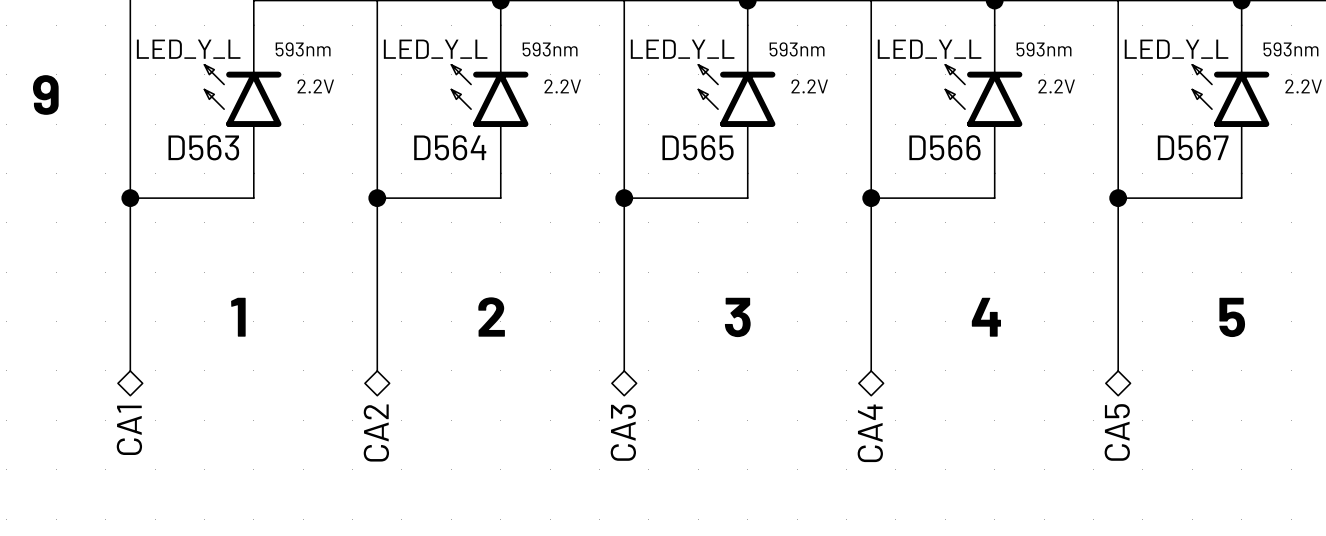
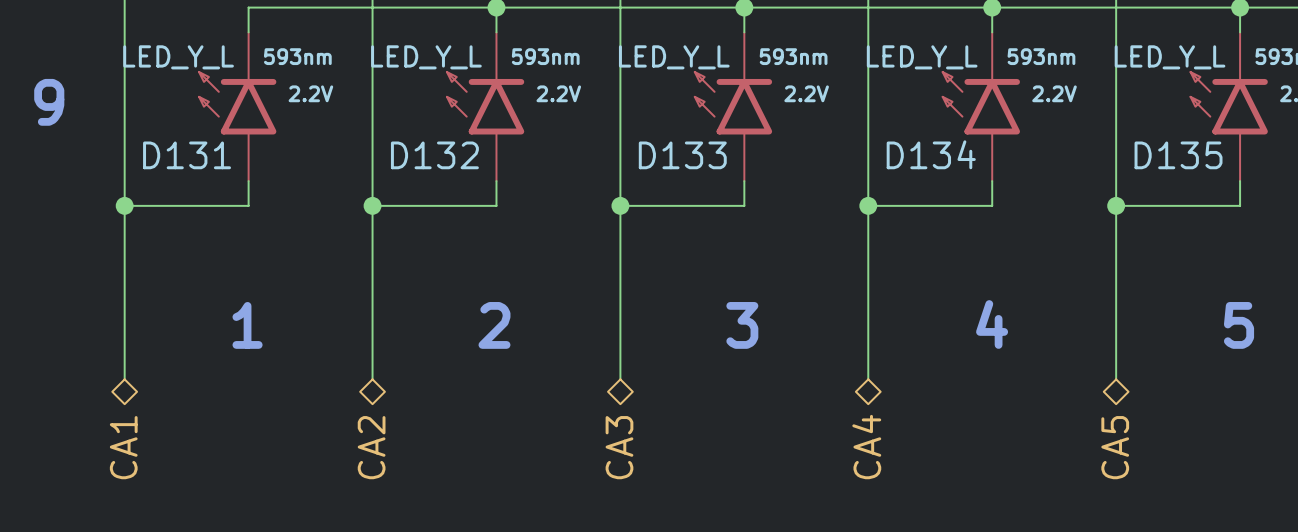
D563 name: D563 (203, 147) -> D131 (187, 155)
D564 name: D564 (450, 147) -> D132 (434, 155)
D565 name: D565 (698, 147) -> D133 (682, 155)
D566 name: D566 (944, 147) -> D134 (931, 154)
D567 name: D567 (1193, 147) -> D135 (1178, 155)

